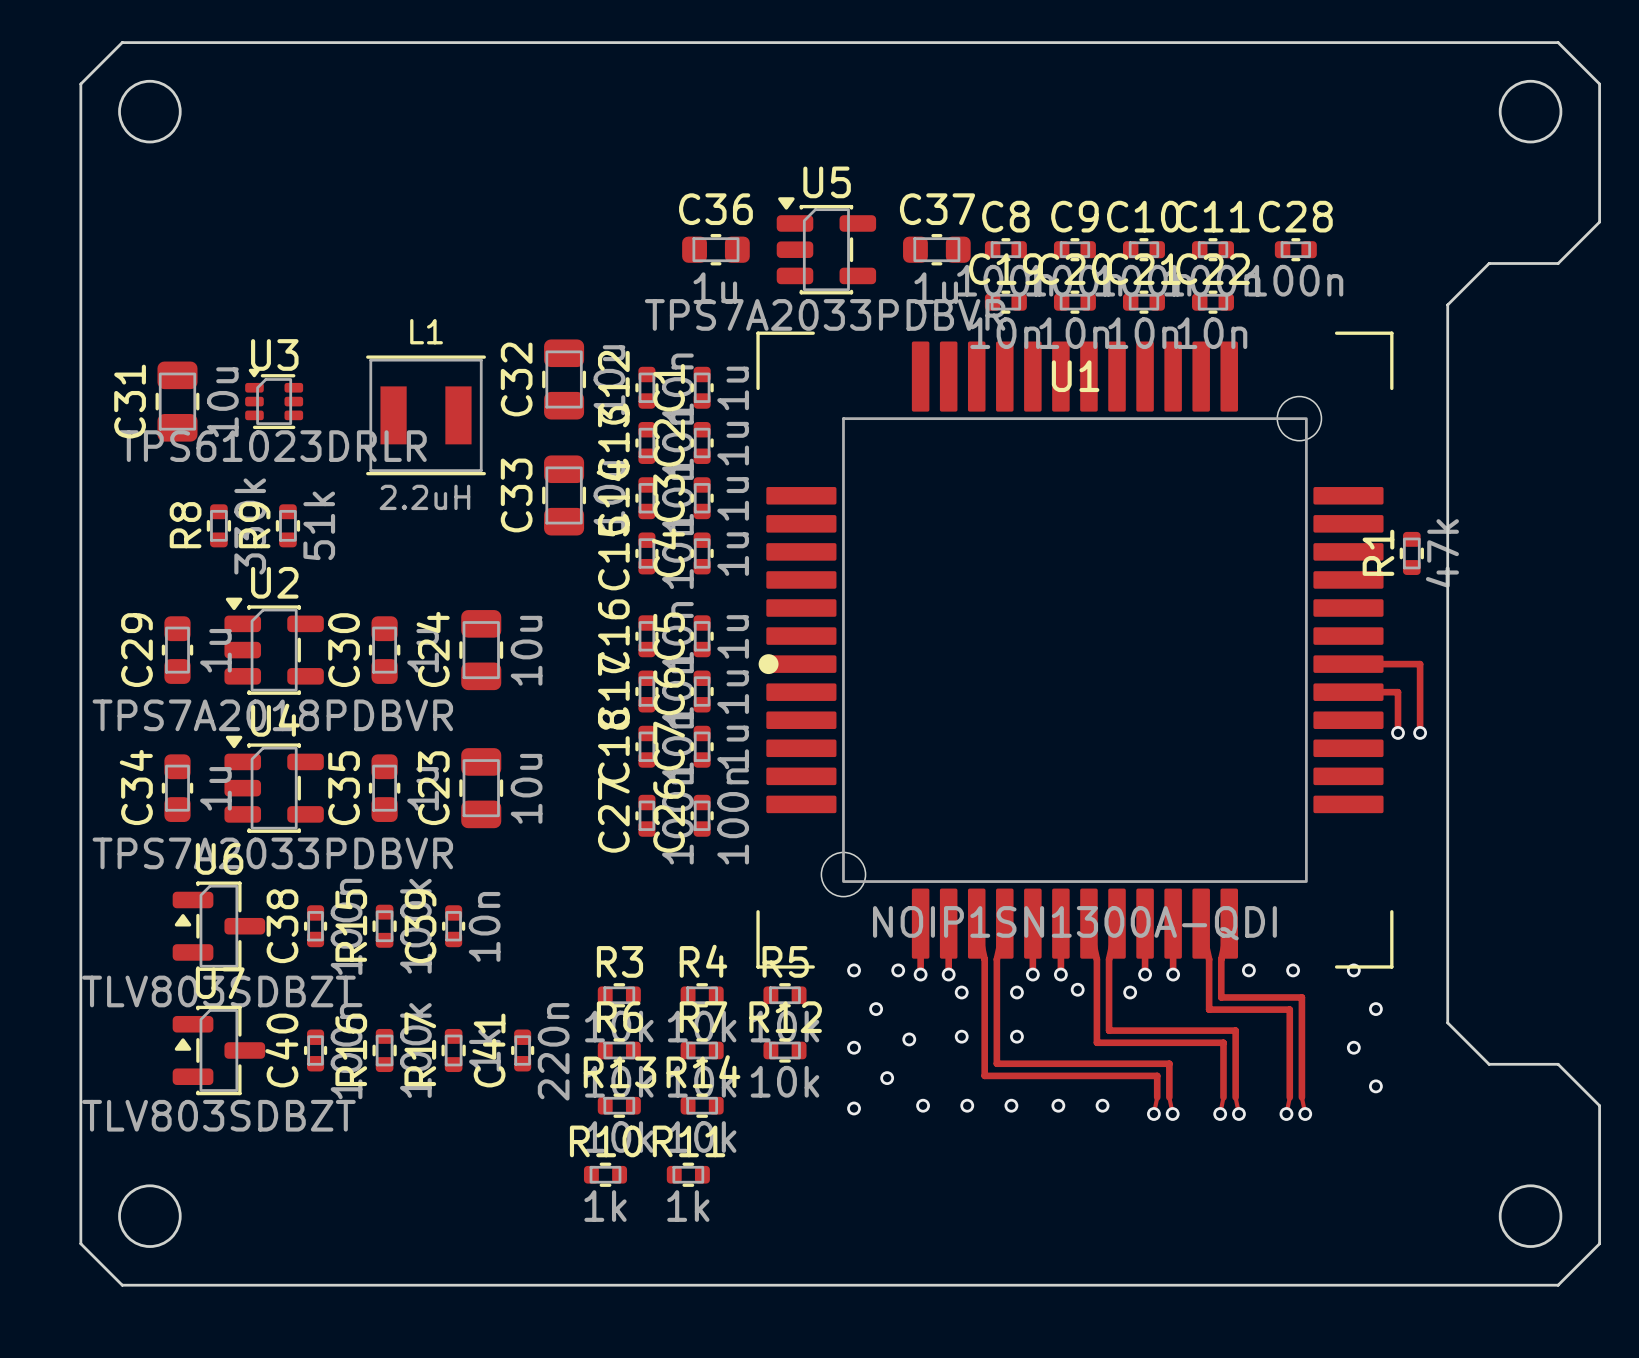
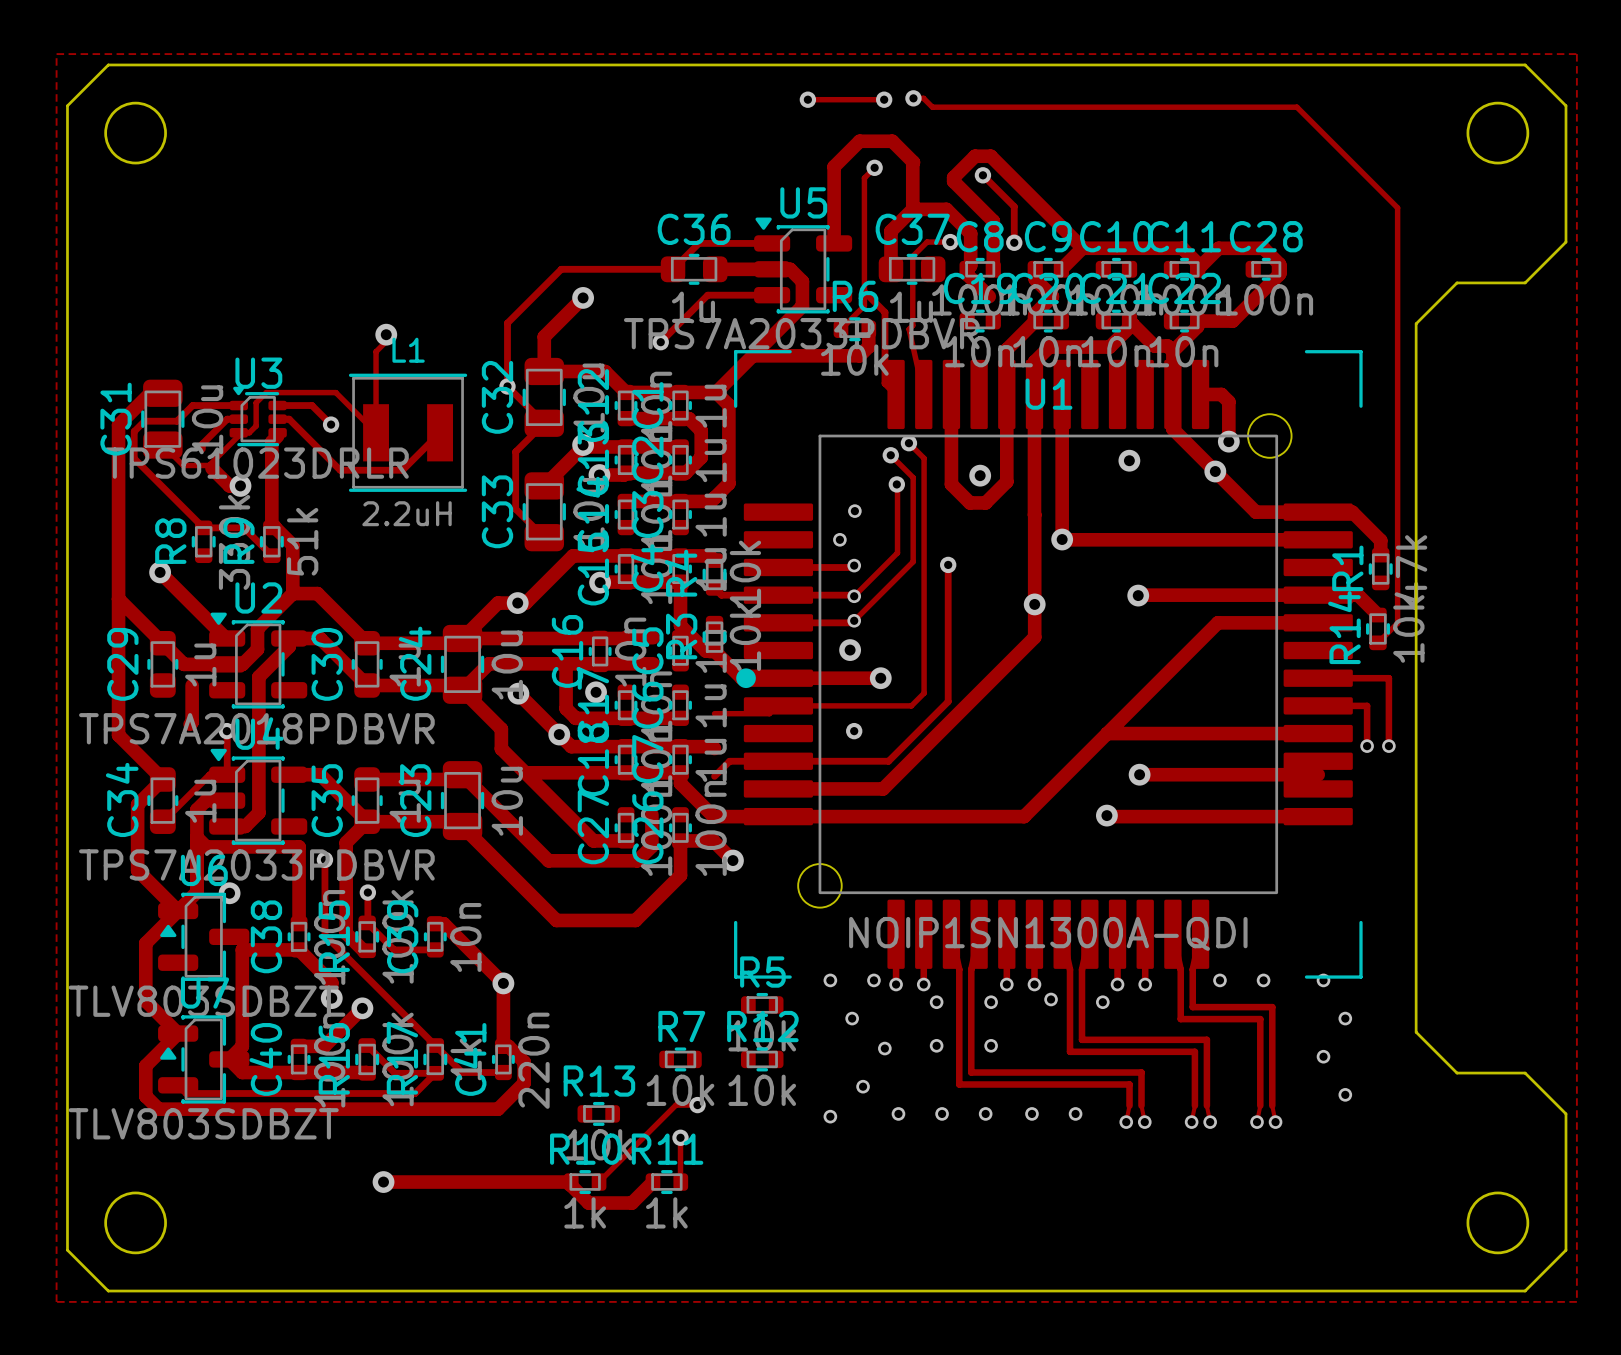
zone outline: none -> (56, 54) (1576, 54) (1576, 1301) (56, 1301) (56, 54)
track: none -> (913, 98) (923, 98) (932, 107) (1296, 107) (1397, 207) (1397, 623) (1378, 642)
via: none -> (913, 98)
track: none -> (807, 99) (884, 99)
via: none -> (807, 99)
via: none -> (884, 99)
track: none -> (874, 167) (864, 178) (864, 305) (840, 329)
via: none -> (874, 167)
track: none -> (982, 175) (1014, 206) (1014, 242)
via: none -> (982, 175)
track: none -> (912, 209) (946, 209) (970, 233) (970, 265) (967, 269) (967, 274) (989, 296)
track: none -> (912, 209) (913, 162) (892, 141) (859, 141) (834, 166) (834, 243)
track: none -> (912, 209) (890, 231) (890, 269)
track: none -> (950, 242) (927, 242) (912, 256) (912, 325) (909, 329) (923, 394)
via: none -> (950, 242)
via: none -> (1014, 242)
track: none -> (772, 243) (698, 243) (673, 269) (561, 269) (507, 323) (507, 386) (544, 423) (515, 451) (515, 509) (544, 537)
track: none -> (1082, 247) (990, 156) (975, 156) (953, 177) (953, 181) (993, 221) (993, 269)
track: none -> (1200, 266) (1182, 248) (1082, 248) (1061, 269)
track: none -> (715, 269) (790, 269) (802, 281) (802, 306) (716, 392)
track: none -> (1035, 269) (1035, 279) (1052, 296) (1035, 313) (1035, 321) (1006, 349) (1006, 481) (985, 502) (969, 502) (951, 484) (951, 394)
track: none -> (1197, 269) (1218, 248) (1263, 248) (1279, 264) (1279, 274) (1232, 321) (1197, 321) (1197, 326) (1172, 351)
track: none -> (864, 291) (884, 312) (884, 383) (896, 394)
track: none -> (772, 295) (707, 295) (660, 342)
track: none -> (583, 297) (544, 336) (544, 371) (605, 371) (626, 392) (716, 392)
via: none -> (583, 297)
track: none -> (1132, 324) (1154, 346) (1167, 346) (1172, 351)
track: none -> (1132, 324) (1109, 347) (1049, 347) (1034, 361) (1034, 514)
track: none -> (868, 329) (868, 346) (859, 355) (752, 355)
track: none -> (386, 334) (386, 341) (376, 351) (376, 432) (335, 392) (266, 392) (256, 402) (256, 425) (249, 432) (238, 432) (238, 435) (209, 465) (183, 465) (162, 445)
via: none -> (386, 334)
via: none -> (660, 342)
track: none -> (1172, 351) (1172, 429) (1255, 512) (1352, 512) (1380, 540) (1380, 555)
via: none -> (507, 386)
track: none -> (716, 392) (728, 405) (728, 483) (711, 501) (626, 501)
track: none -> (162, 393) (150, 393) (118, 425) (118, 735) (162, 779) (137, 804) (137, 870) (178, 910)
track: none -> (1062, 394) (1062, 539)
track: none -> (1200, 394) (1221, 394) (1228, 401) (1228, 441)
track: none -> (238, 405) (192, 405) (177, 421) (144, 421) (134, 431) (134, 458) (203, 527) (244, 527) (271, 555)
track: none -> (277, 405) (312, 405) (331, 424)
track: none -> (238, 419) (227, 419) (202, 444) (202, 449)
track: none -> (277, 419) (289, 419) (340, 470) (402, 470) (440, 432)
track: none -> (626, 418) (688, 418) (701, 430) (701, 457) (685, 473) (599, 475)
via: none -> (331, 424)
track: none -> (277, 436) (271, 441) (271, 527) (275, 527) (292, 545) (292, 593)
via: none -> (1228, 441)
track: none -> (908, 443) (924, 458) (924, 693) (911, 705) (777, 705) (769, 713) (714, 713)
via: none -> (908, 443)
via: none -> (583, 445)
track: none -> (680, 446) (585, 446) (583, 445) (544, 485)
track: none -> (890, 455) (913, 477) (913, 561) (852, 622) (778, 622)
via: none -> (890, 455)
via: none -> (1129, 460)
track: none -> (212, 468) (229, 485) (240, 485)
via: none -> (1215, 471)
via: none -> (599, 475)
via: none -> (980, 475)
track: none -> (896, 484) (897, 552) (854, 596) (721, 595) (714, 588)
via: none -> (896, 484)
via: none -> (240, 485)
via: none -> (854, 511)
track: none -> (1034, 514) (1034, 637) (883, 788) (778, 788)
via: none -> (839, 539)
track: none -> (1061, 539) (1318, 539)
via: none -> (1062, 539)
track: none -> (714, 560) (709, 555) (572, 555) (525, 603) (497, 603) (457, 643) (367, 643) (317, 593) (292, 593)
track: none -> (854, 565) (852, 567) (778, 567)
via: none -> (854, 565)
track: none -> (948, 564) (948, 701) (888, 761) (729, 761) (714, 776)
via: none -> (948, 564)
track: none -> (160, 572) (227, 638)
via: none -> (160, 572)
track: none -> (600, 582) (680, 582) (680, 625) (705, 651) (714, 651) (741, 678) (880, 678)
via: none -> (600, 582)
track: none -> (292, 593) (257, 628) (257, 649) (242, 664) (183, 664) (118, 598)
track: none -> (1138, 595) (1358, 595) (1378, 615)
via: none -> (1138, 595)
via: none -> (854, 596)
via: none -> (517, 603)
via: none -> (1034, 604)
via: none -> (854, 620)
track: none -> (1318, 622) (1217, 622) (1024, 816) (713, 816) (680, 783) (680, 772) (525, 772)
track: none -> (653, 637) (462, 638)
via: none -> (850, 650)
C16 position: (646, 636) -> (600, 651)
track: none -> (566, 663) (566, 708) (575, 718) (680, 718)
track: none -> (653, 663) (488, 663) (462, 690)
via: none -> (880, 678)
track: none -> (192, 685) (192, 722) (190, 724)
via: none -> (596, 692)
track: none -> (518, 693) (571, 746) (712, 746) (714, 748)
via: none -> (518, 693)
via: none -> (226, 731)
via: none -> (854, 731)
track: none -> (227, 731) (227, 774) (209, 774) (162, 821)
track: none -> (1107, 733) (1318, 733)
via: none -> (559, 734)
track: none -> (289, 774) (320, 774) (367, 821)
track: none -> (371, 774) (367, 779) (457, 779) (462, 774) (548, 860) (637, 860) (651, 846) (651, 814)
track: none -> (1139, 774) (1318, 774)
via: none -> (1139, 774)
track: none -> (227, 800) (206, 800) (196, 809) (196, 892) (145, 943) (145, 1001) (178, 1033) (145, 1065) (145, 1096) (158, 1109) (498, 1109) (524, 1083) (524, 1061) (508, 1046) (503, 1046) (503, 983) (443, 923) (435, 923)
track: none -> (1106, 815) (1318, 816)
via: none -> (1106, 815)
track: none -> (367, 821) (346, 842) (346, 933) (363, 950) (367, 950)
track: none -> (367, 821) (457, 821) (556, 920) (635, 920) (680, 875) (680, 840) (713, 840) (732, 860)
track: none -> (227, 826) (245, 826) (258, 812) (258, 676) (289, 646) (289, 638) (320, 638) (367, 685) (457, 685) (501, 729) (501, 748) (593, 840) (626, 840)
track: none -> (196, 837) (206, 846) (299, 846) (299, 923)
track: none -> (324, 859) (324, 935) (462, 1072) (503, 1072)
via: none -> (324, 859)
via: none -> (732, 860)
track: none -> (367, 892) (367, 922) (394, 949) (435, 949)
via: none -> (367, 892)
via: none -> (229, 893)
via: none -> (503, 983)
track: none -> (331, 998) (331, 982) (299, 949) (242, 949) (242, 1046) (229, 1059) (242, 1072) (367, 1073)
via: none -> (331, 998)
R3 rotation: 0° (619, 995) -> 90° clockwise (714, 637)
R3 position: (619, 995) -> (714, 637)
R4 rotation: 0° (702, 995) -> 90° clockwise (714, 574)
R4 position: (702, 995) -> (714, 574)
track: none -> (362, 1008) (324, 1046) (299, 1046)
via: none -> (362, 1008)
track: none -> (367, 1045) (394, 1073) (435, 1073) (415, 1093) (186, 1093) (178, 1085)
via: (854, 1047) -> none
R6 position: (619, 1050) -> (854, 329)
track: none -> (697, 1105) (676, 1105) (599, 1182)
via: none -> (697, 1105)
R14 rotation: 0° (702, 1105) -> 90° clockwise (1378, 628)
R14 position: (702, 1105) -> (1378, 628)
track: none -> (680, 1137) (680, 1181)
via: none -> (680, 1137)
track: none -> (383, 1182) (571, 1182) (571, 1185) (588, 1203) (632, 1203) (652, 1182)
via: none -> (383, 1182)

